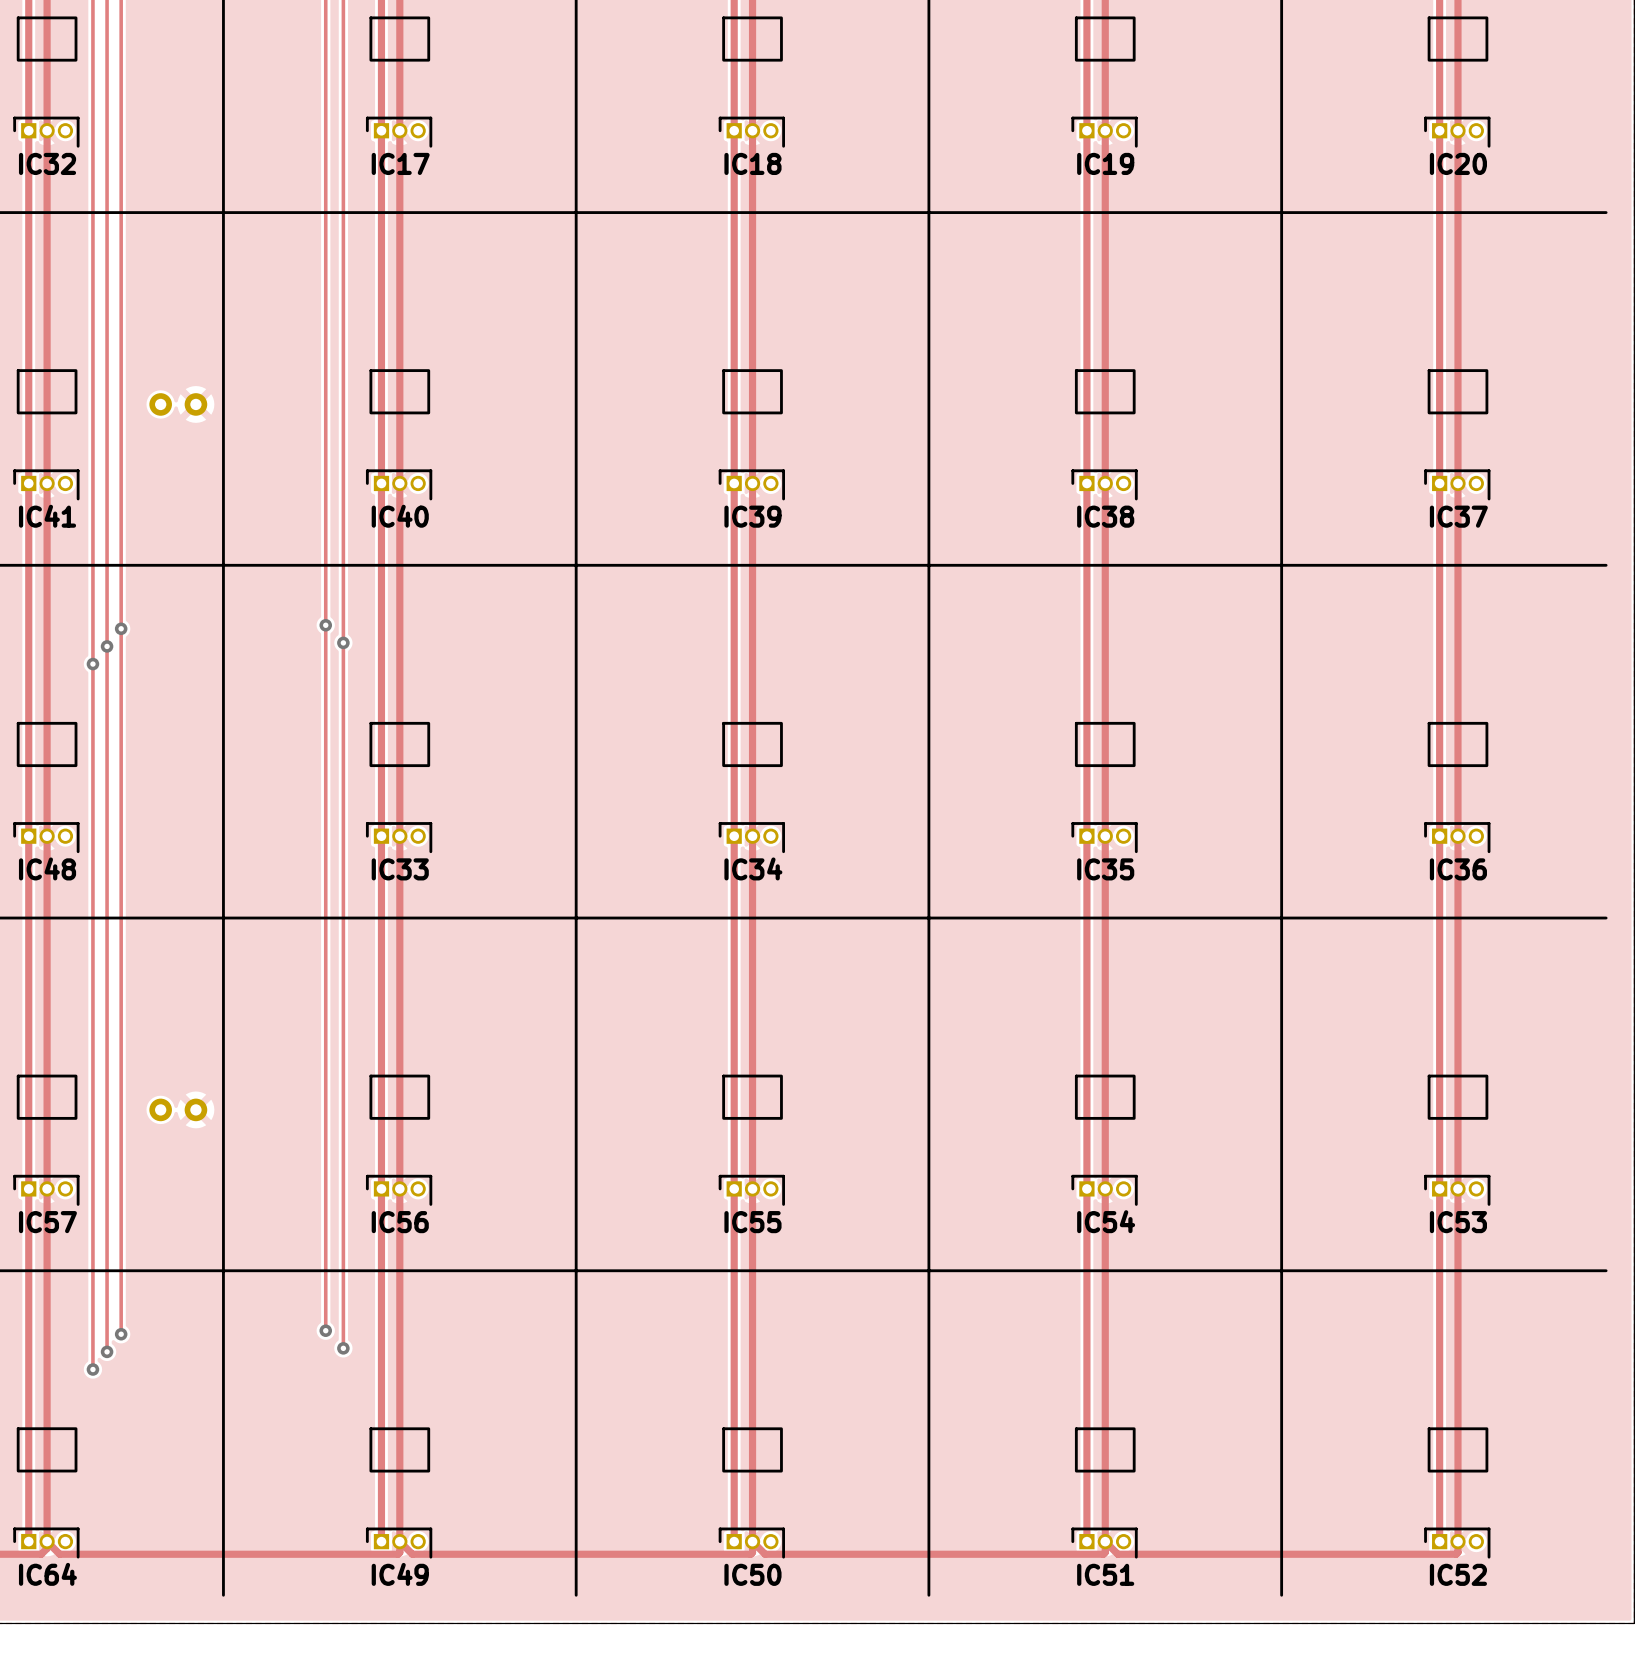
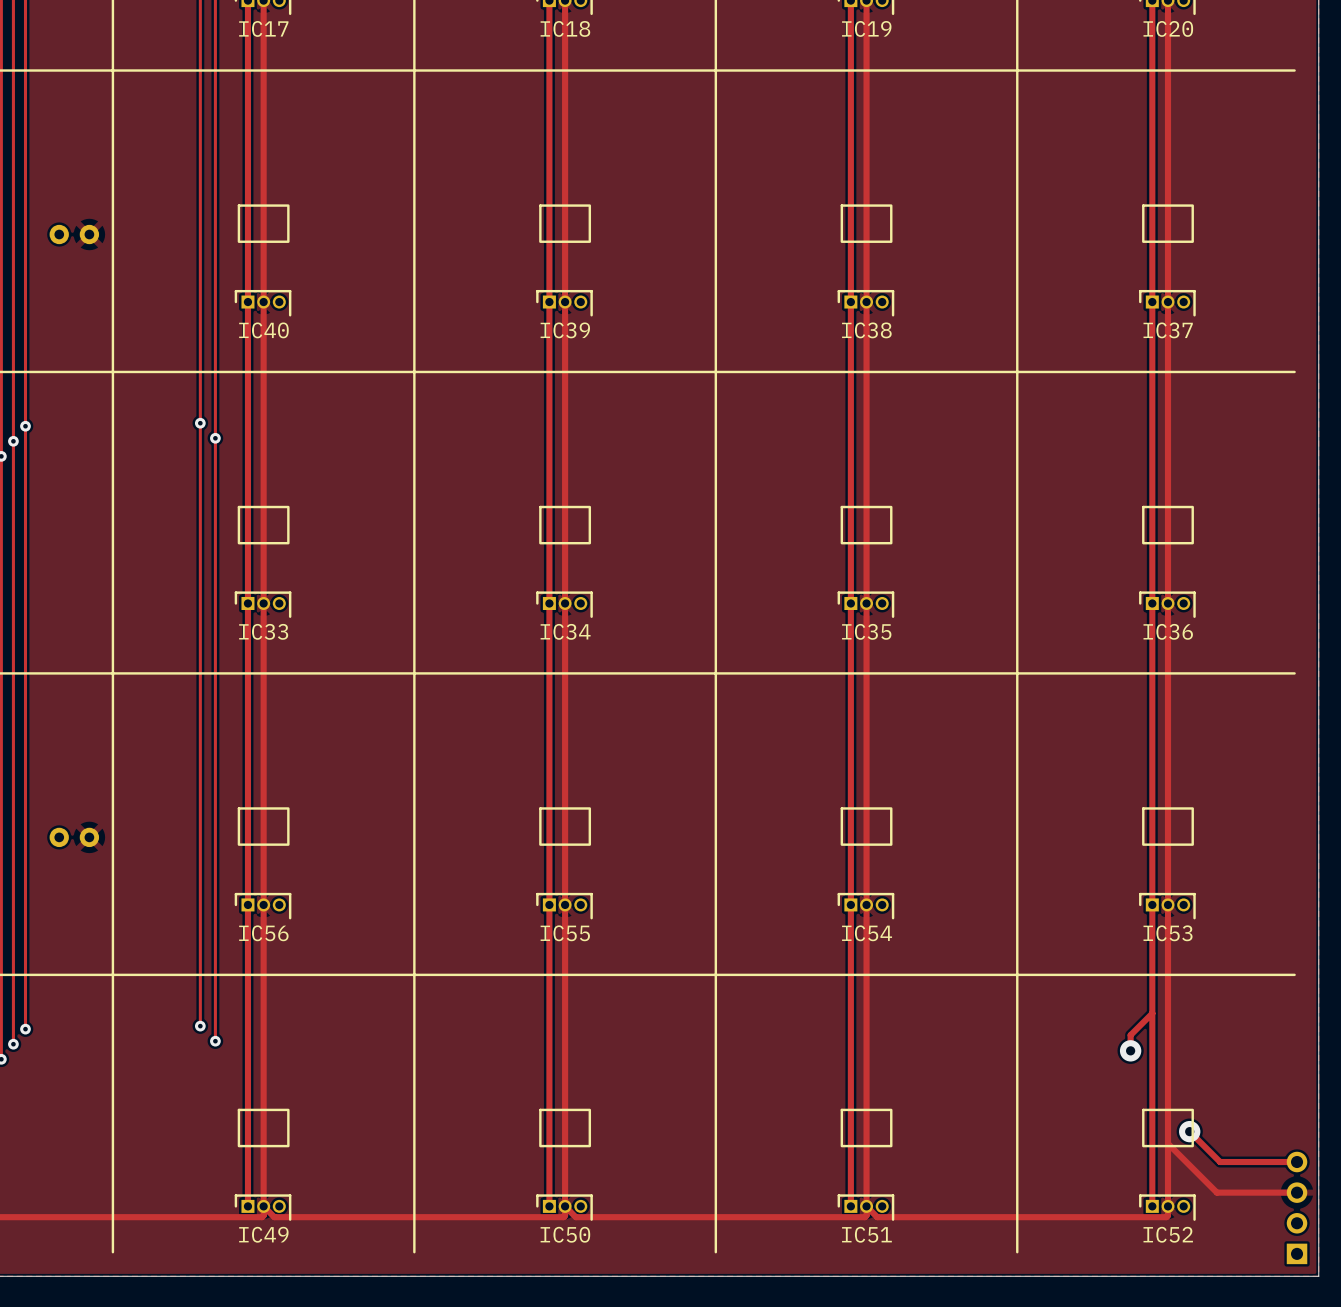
track: none -> (1152, 1013) (1130, 1035) (1130, 1050)
via: none -> (1130, 1050)
track: none -> (1189, 1131) (1220, 1162) (1297, 1162)
via: none -> (1189, 1131)
track: none -> (1168, 1143) (1216, 1192) (1297, 1192)
part: none -> (1297, 1207)

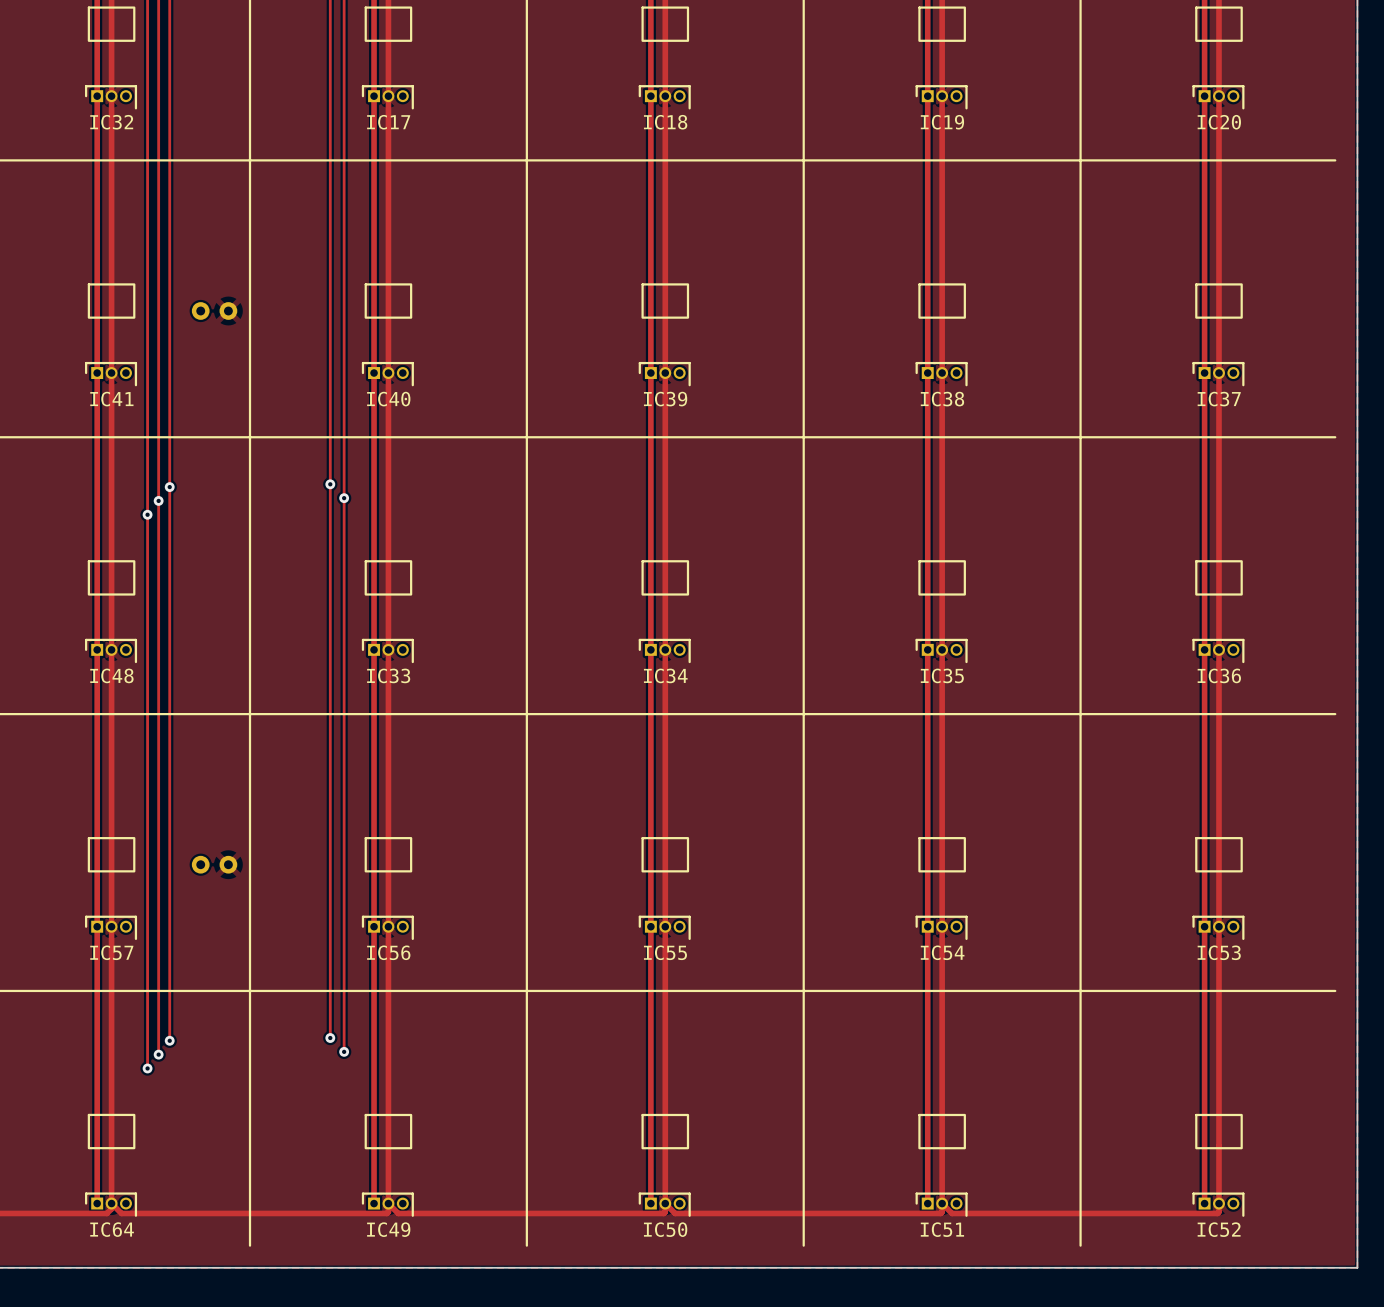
track: (1152, 1013) (1130, 1035) (1130, 1050) -> none
via: (1130, 1050) -> none
track: (1189, 1131) (1220, 1162) (1297, 1162) -> none
via: (1189, 1131) -> none
track: (1168, 1143) (1216, 1192) (1297, 1192) -> none
part: (1297, 1207) -> none

